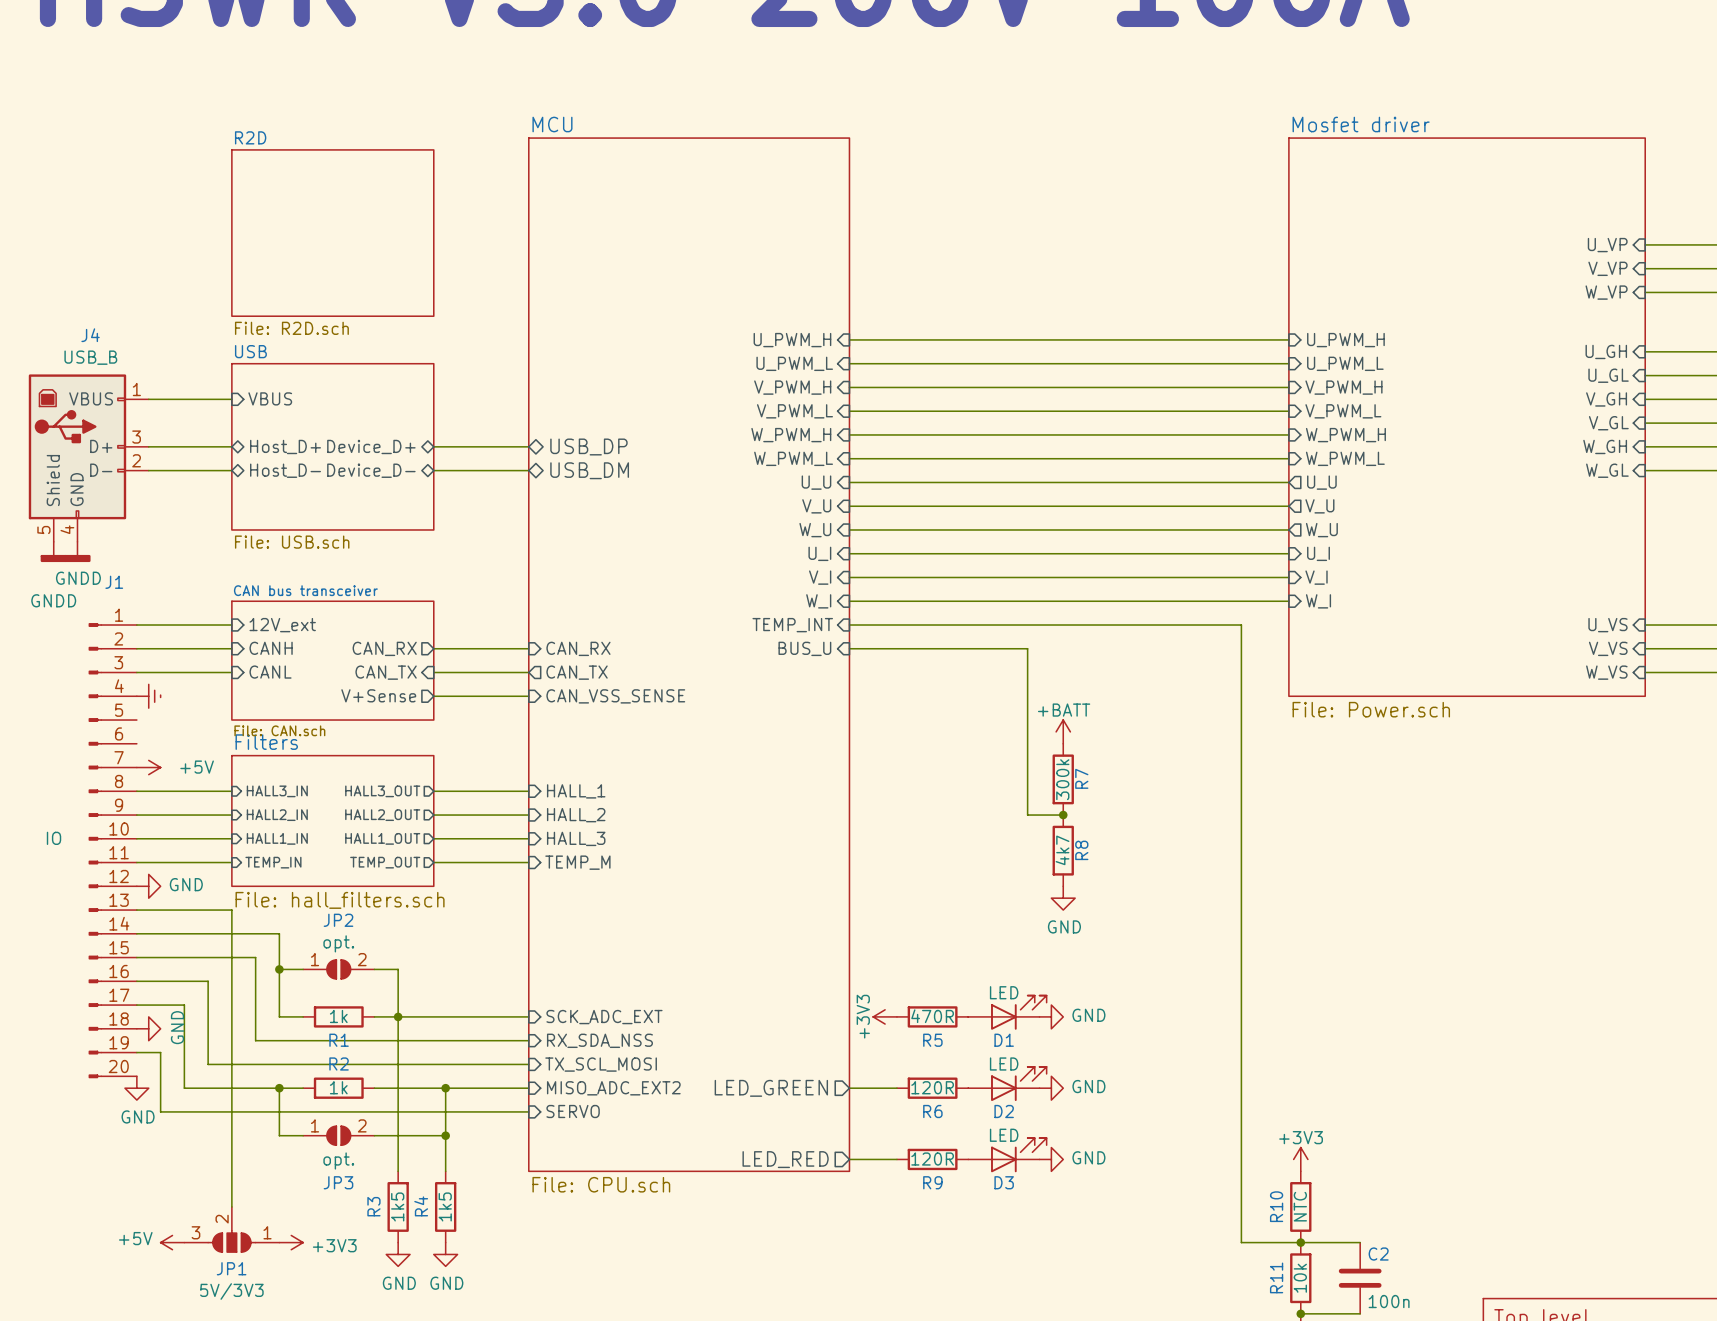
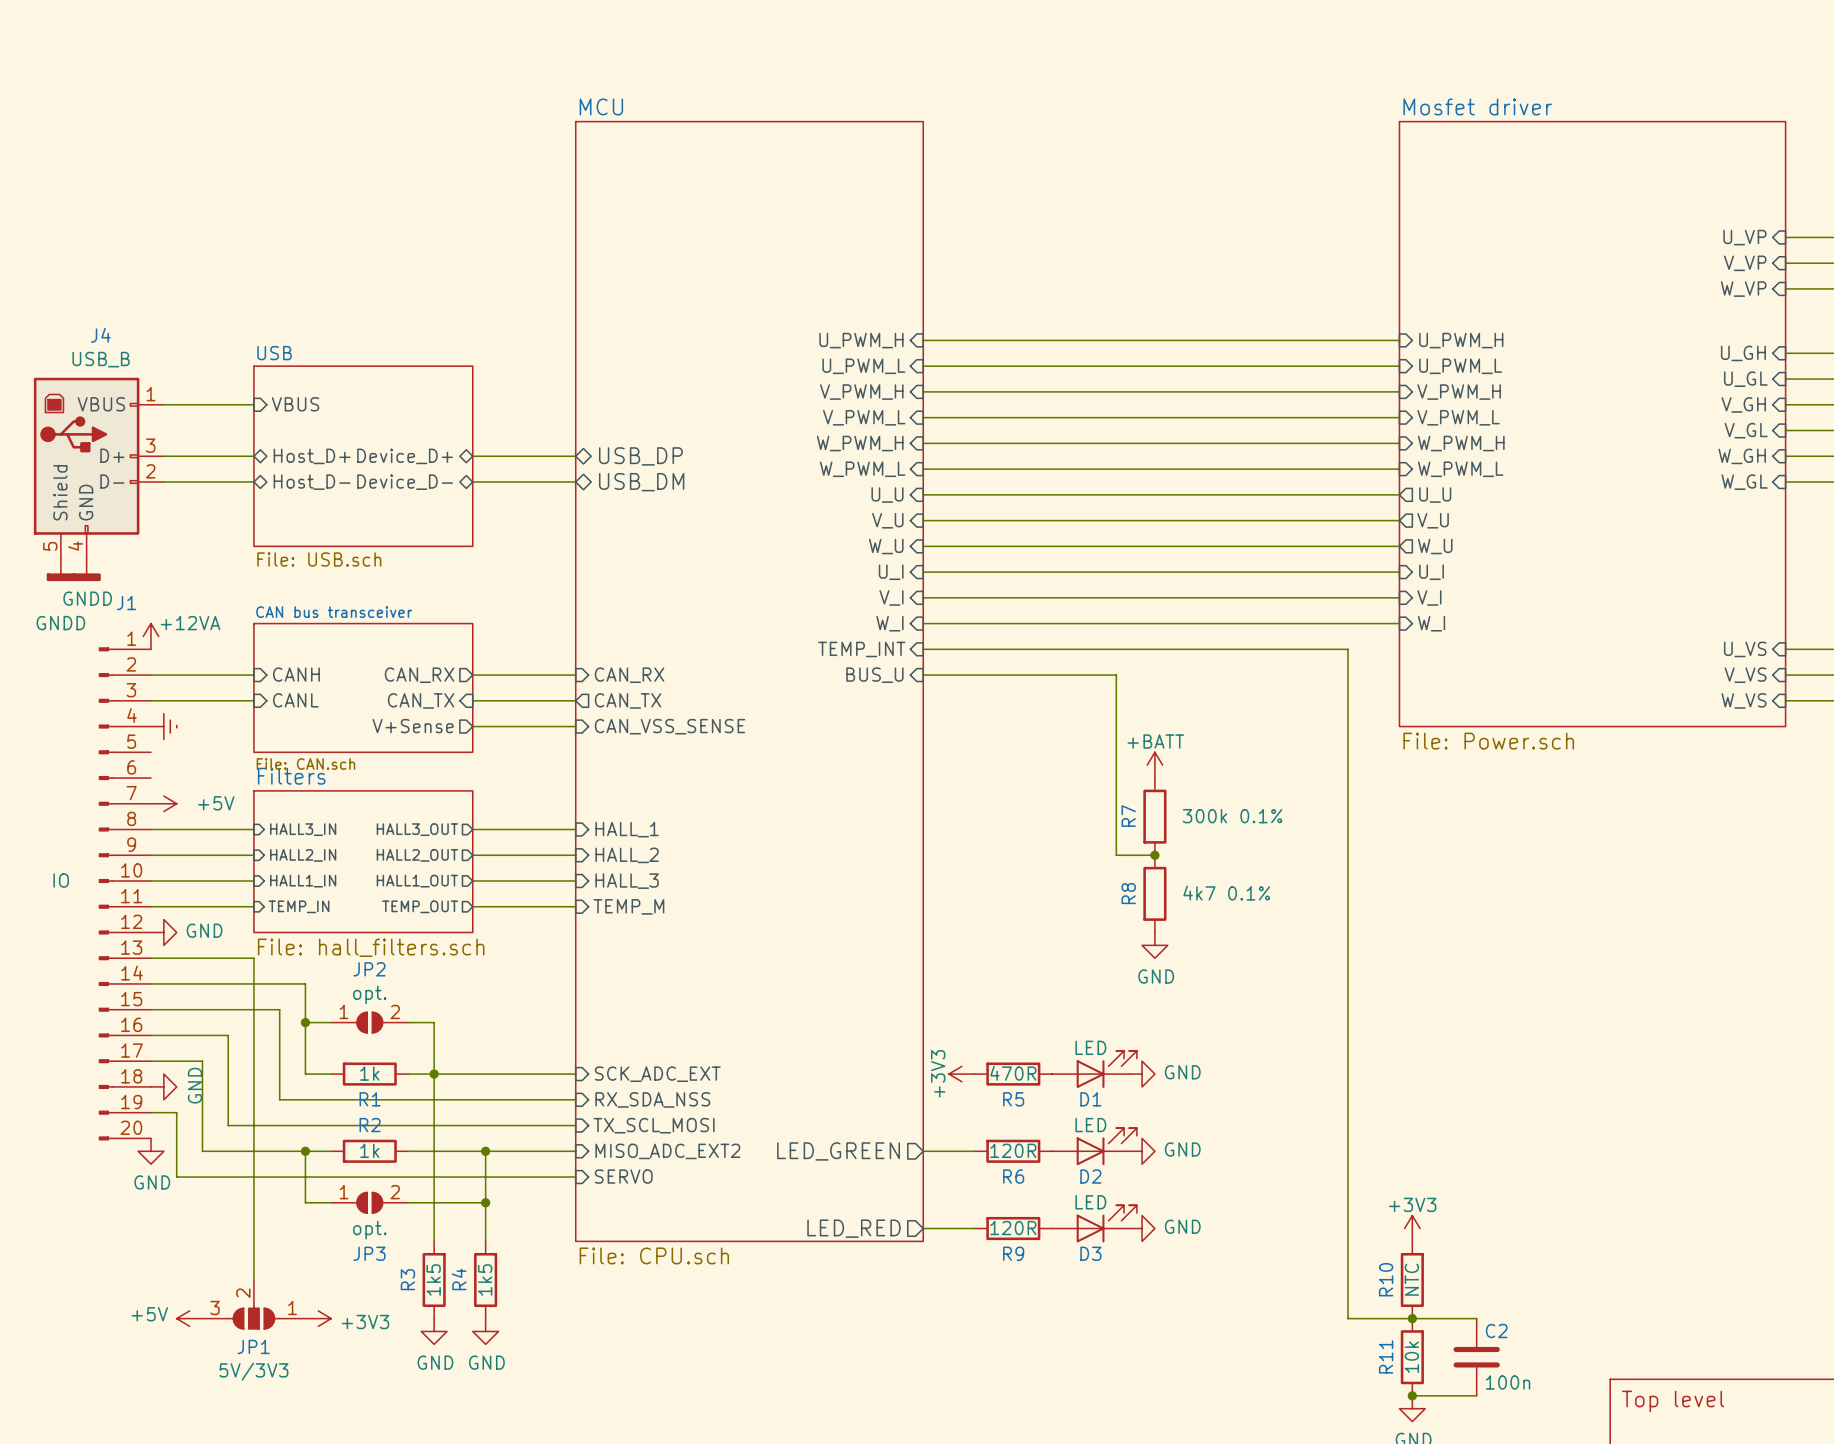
sheet R2D: File: R2D.sch (332, 233) -> none
power symbol: none -> +12VA (150, 636)
wire: (136, 625) (231, 625) -> none
sheet pin: 12V_ext (282, 625) -> none
R7 name position: R7 (1081, 778) -> R7 (1128, 816)
R7 value: 300k (1062, 779) -> 300k 0.1% (1232, 816)
R8 value: 4k7 (1062, 850) -> 4k7 0.1% (1226, 893)
R8 name position: R8 (1081, 850) -> R8 (1128, 893)

